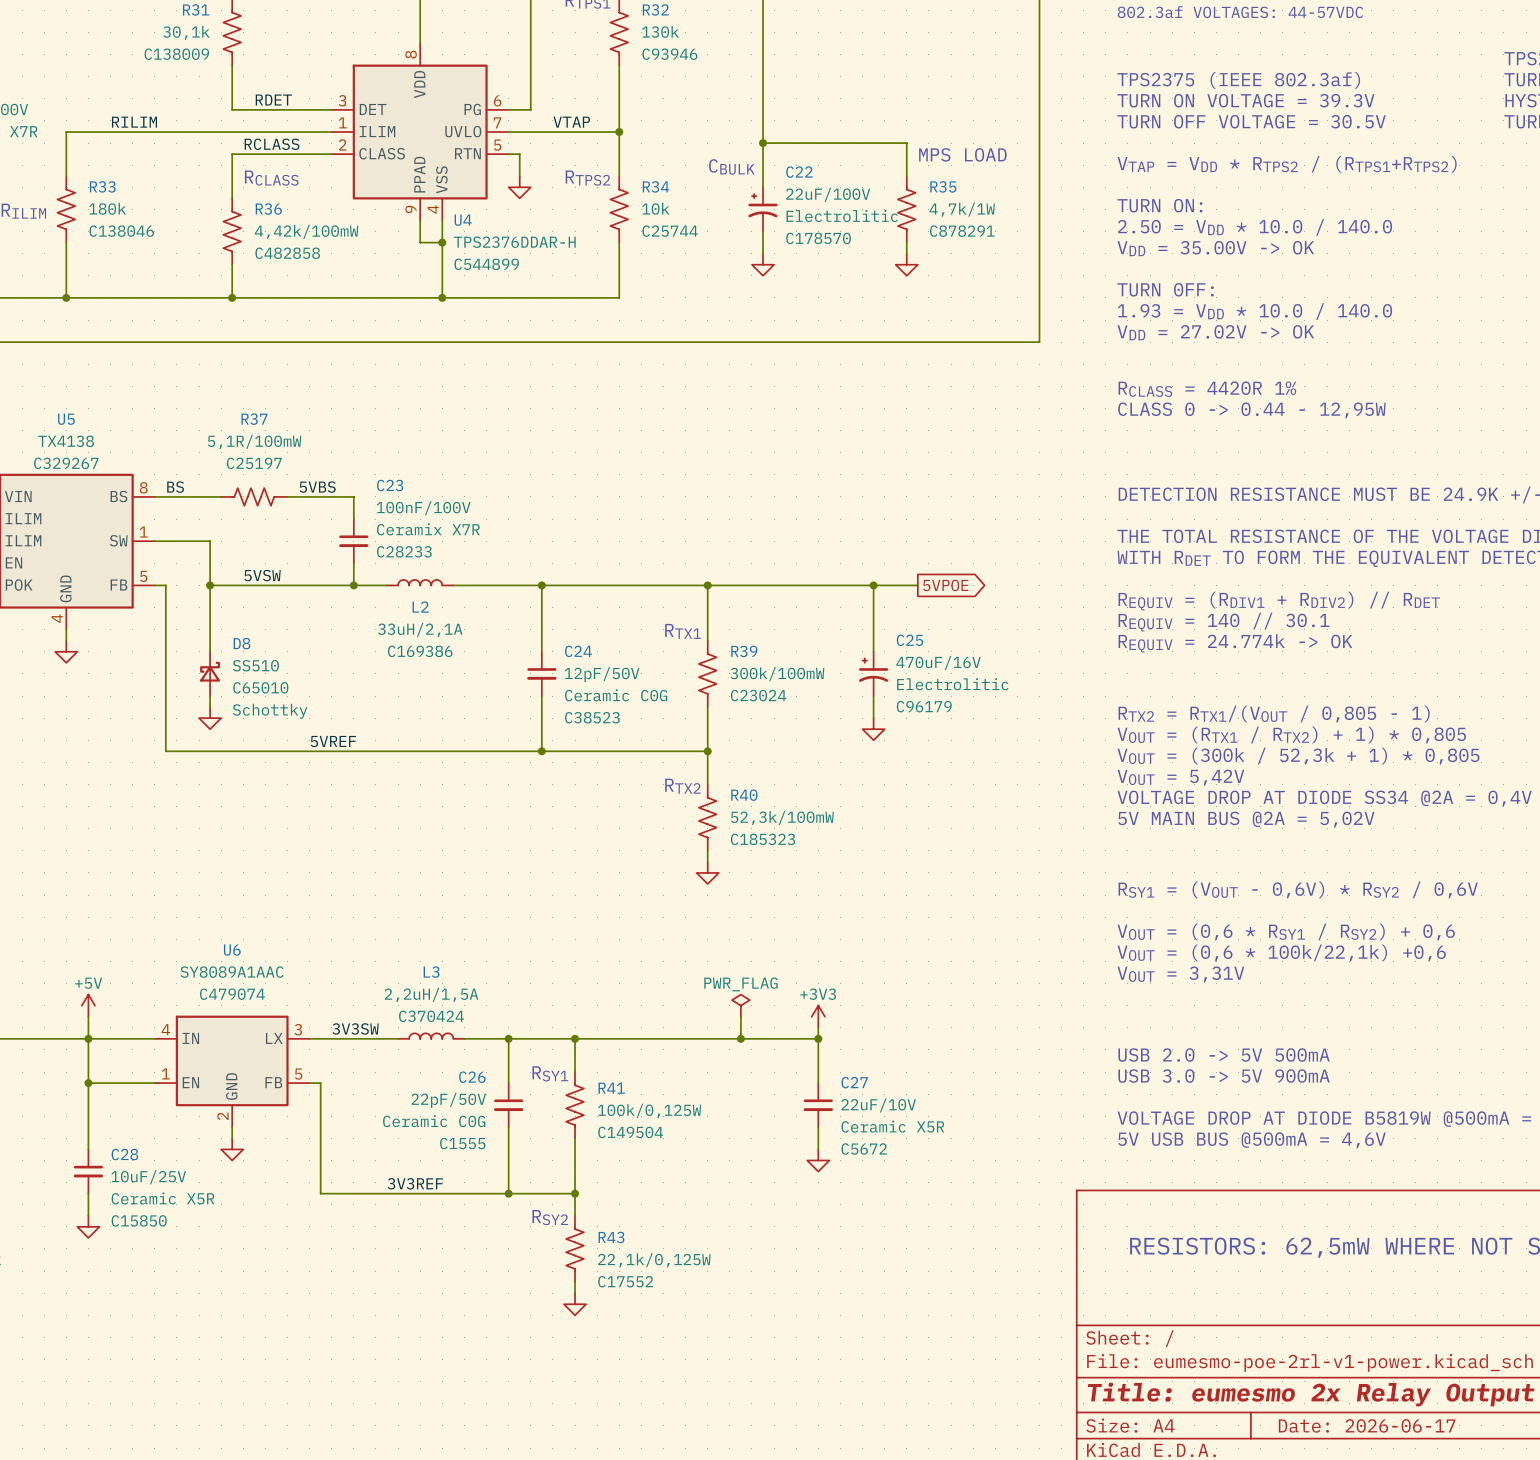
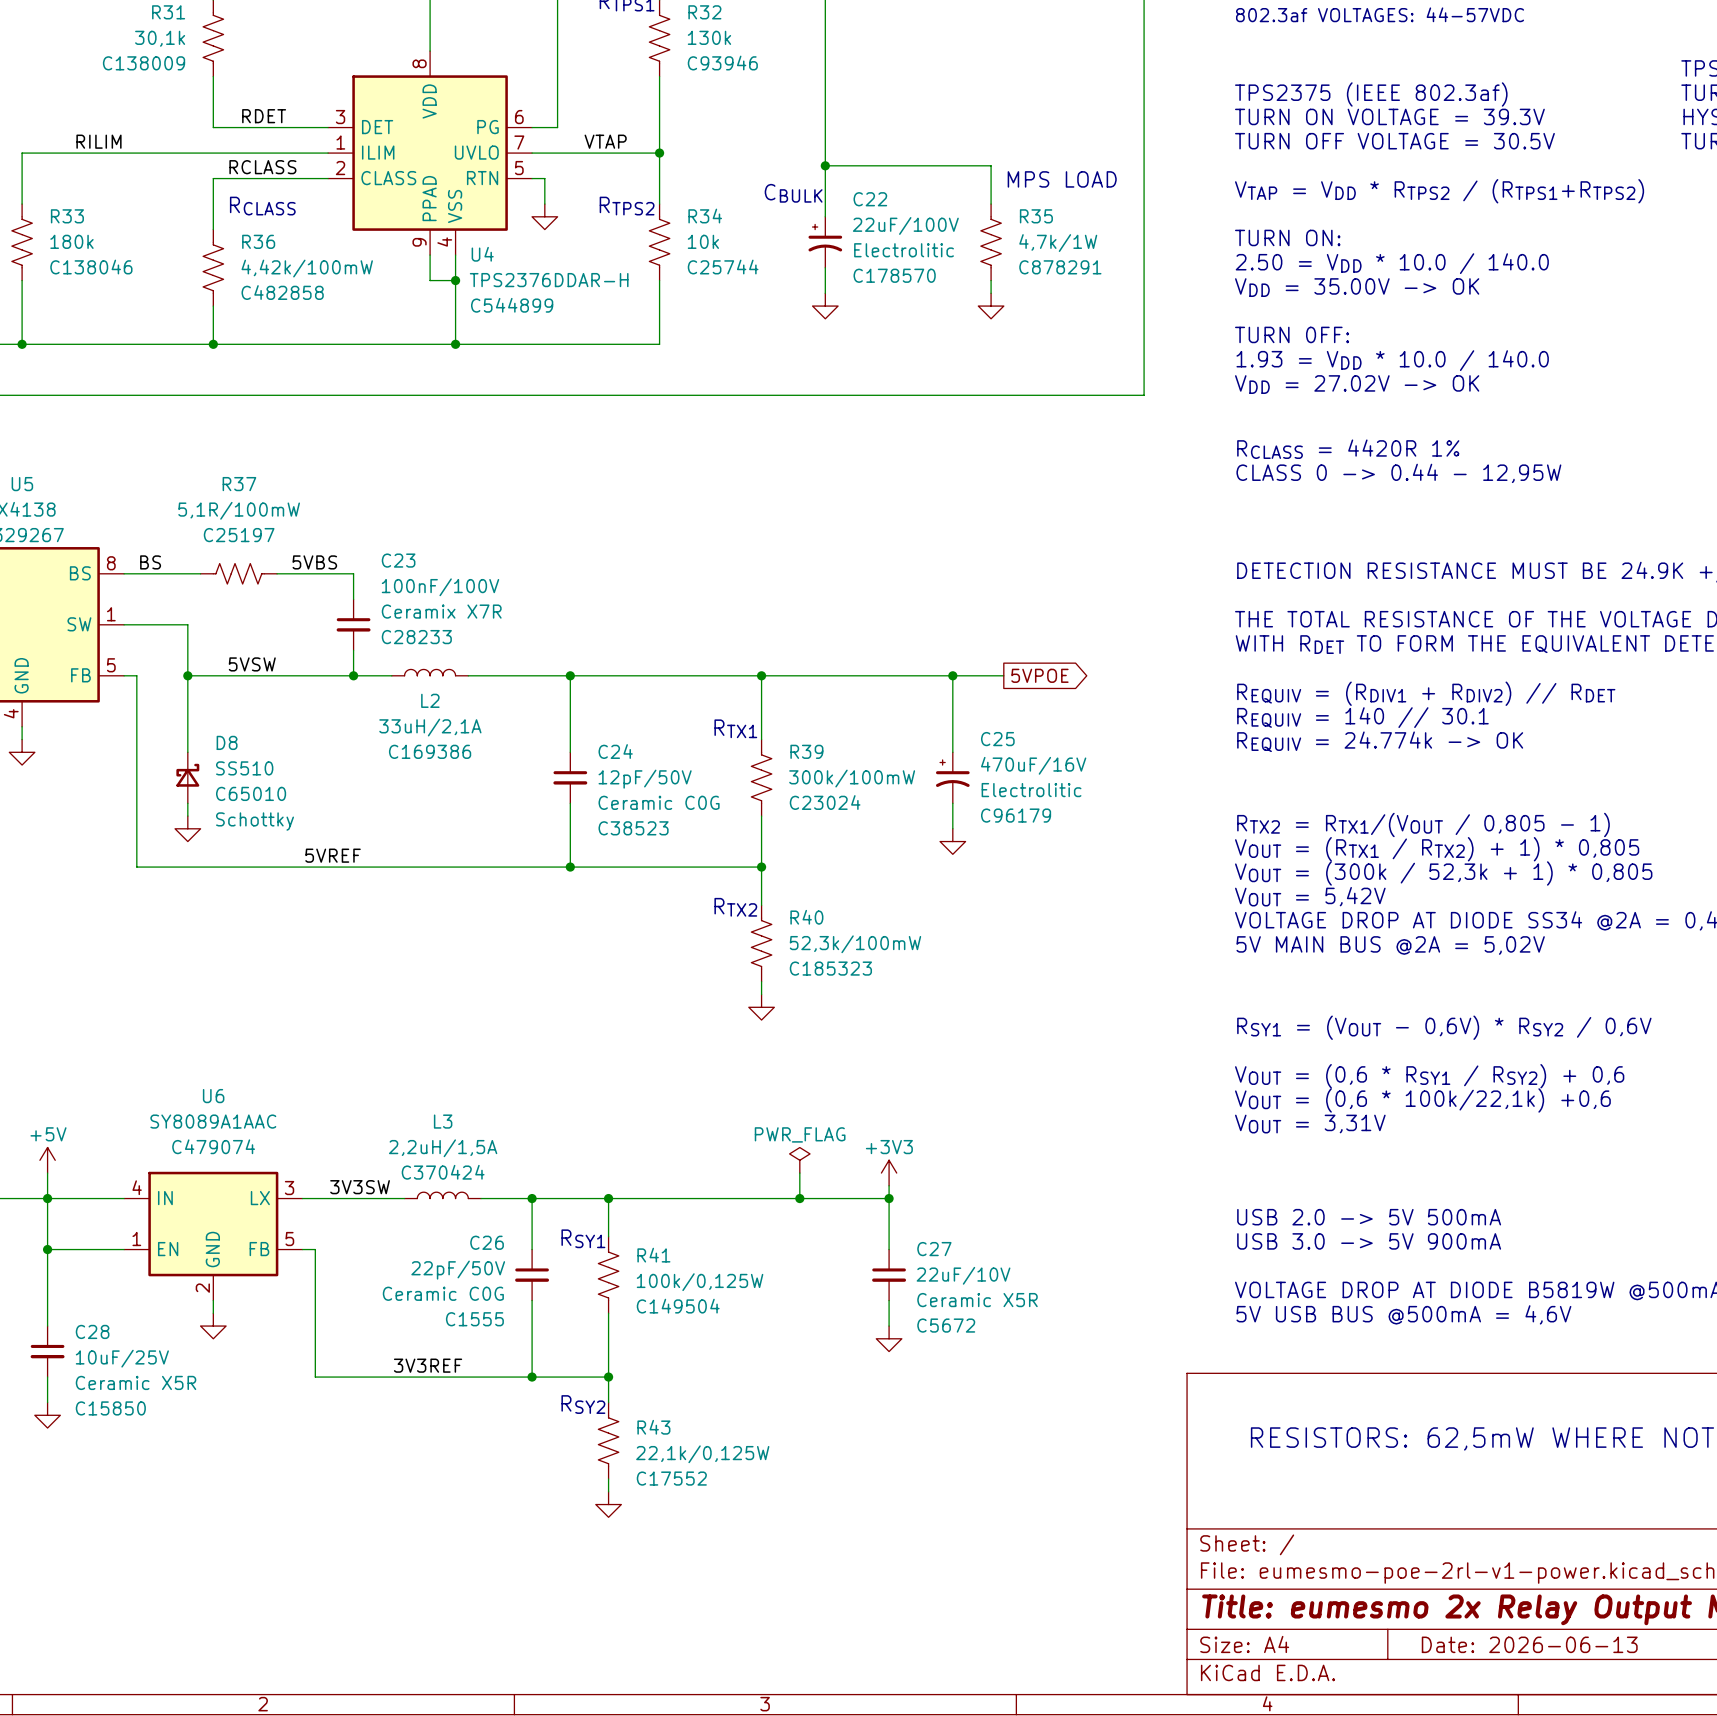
title block: Date: 2026-06-17 (1367, 1425) -> Date: 2026-06-13 (1529, 1644)

